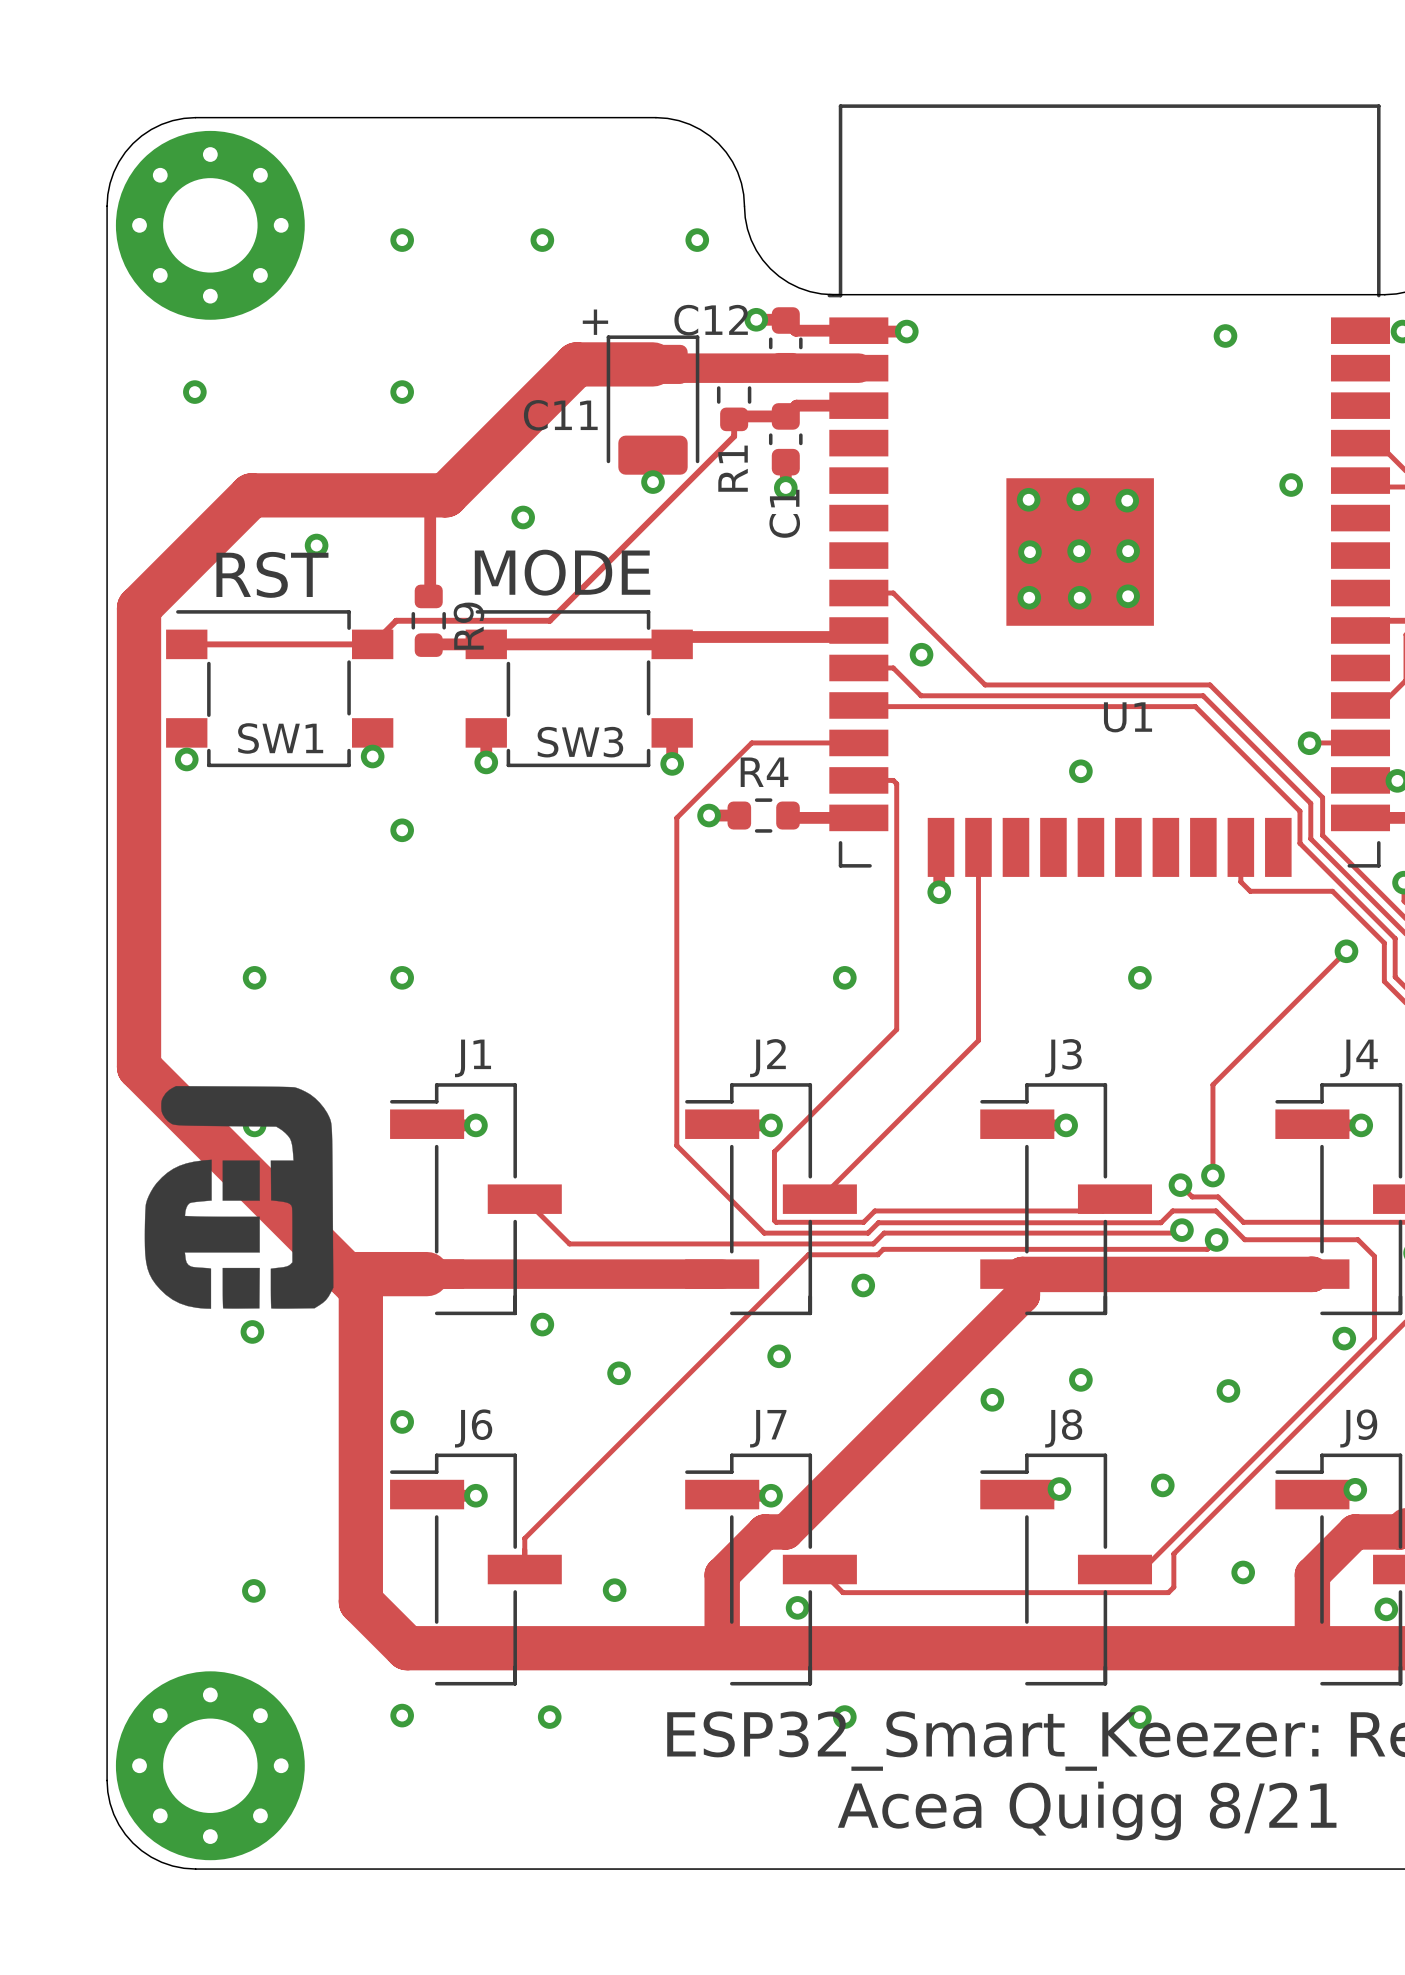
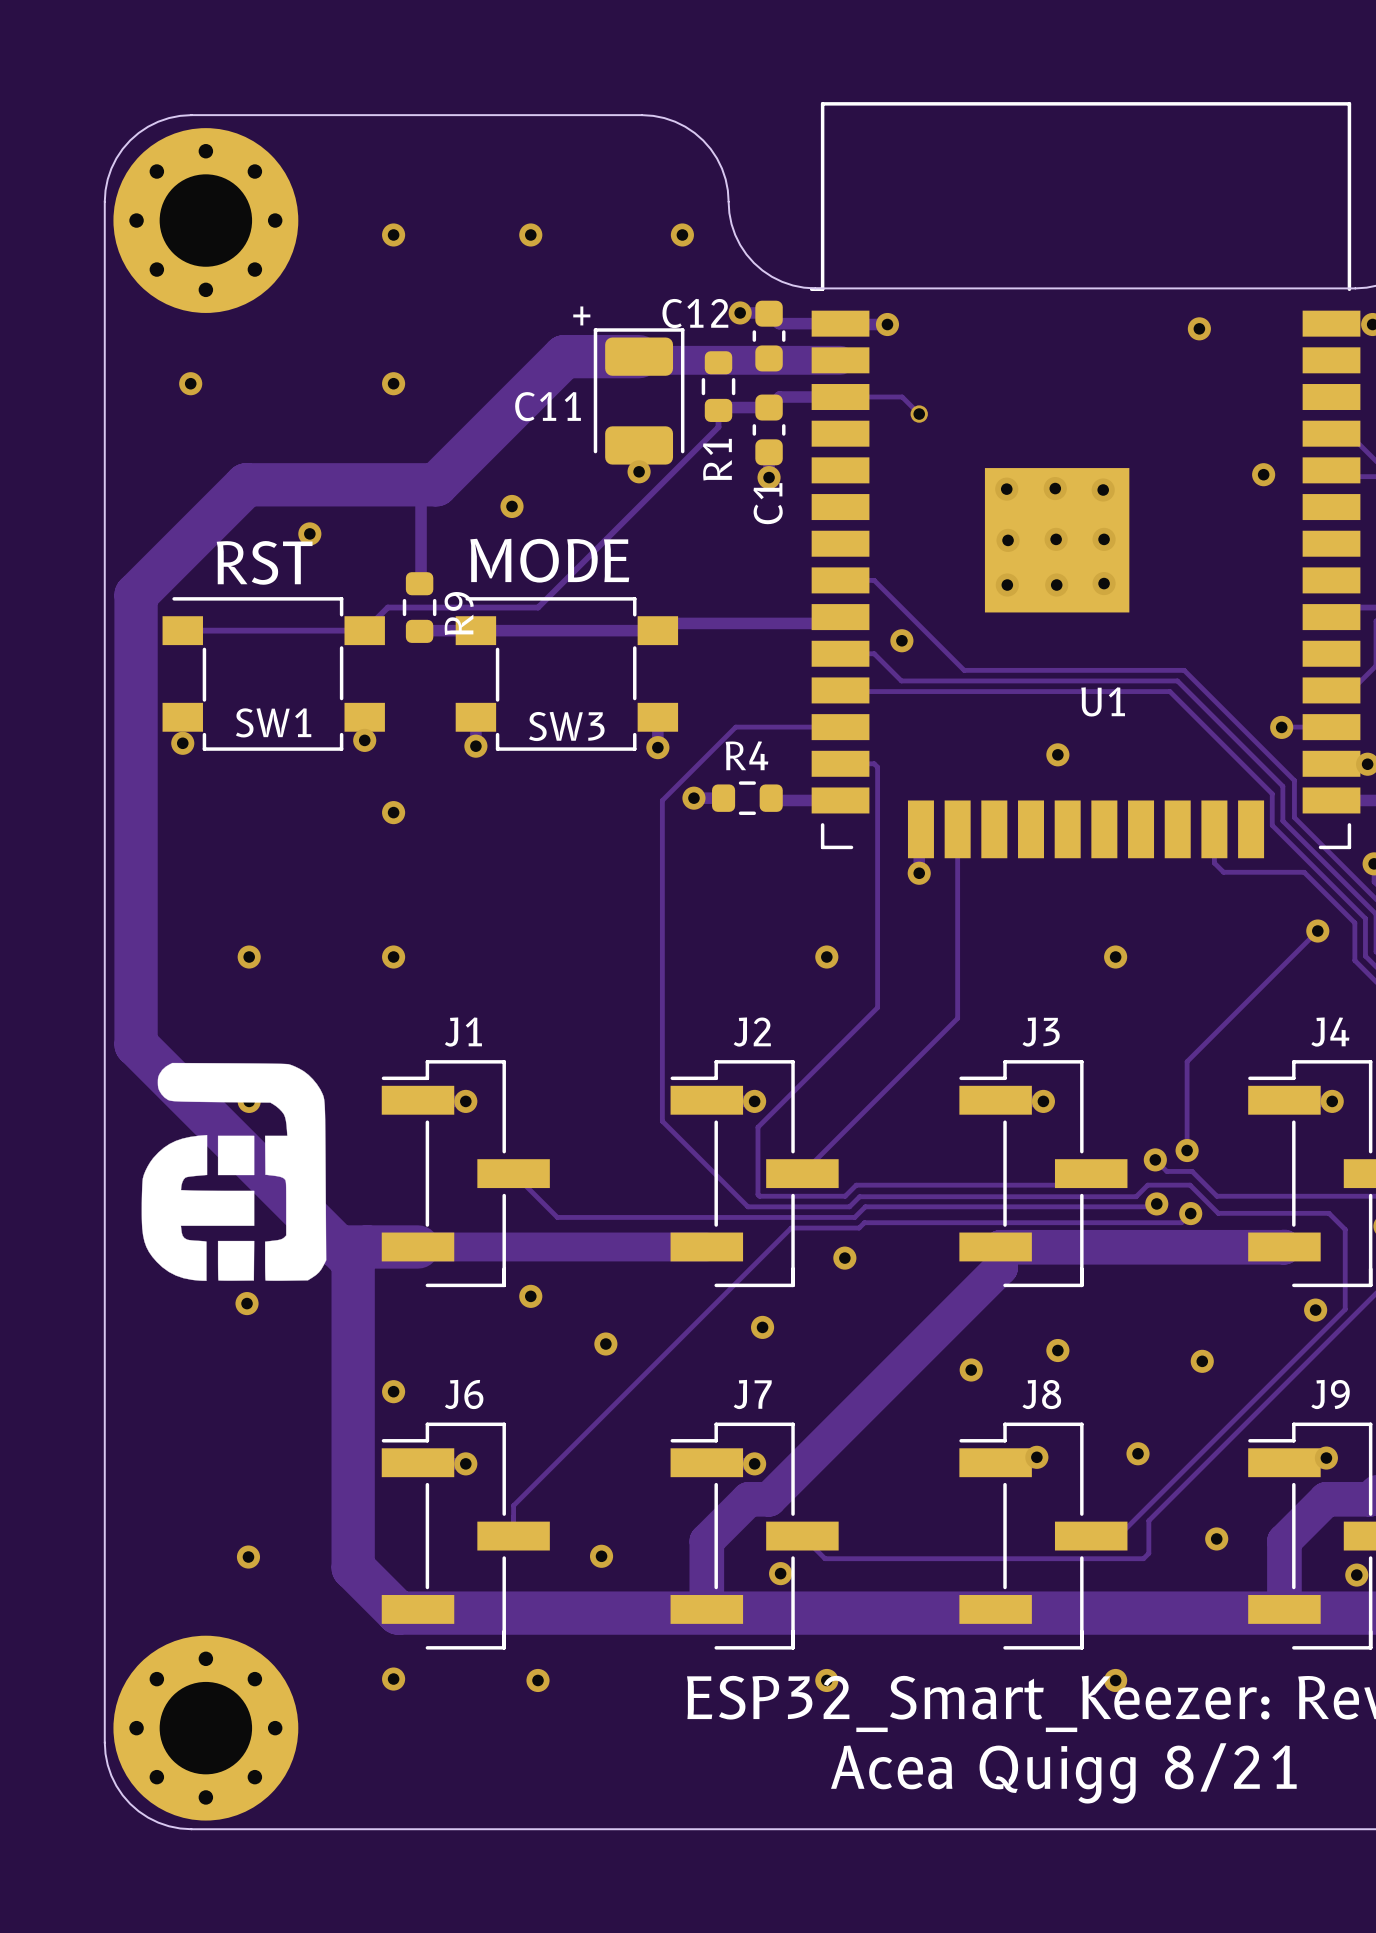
track: none -> (840, 397) (902, 397) (919, 414)
via: none -> (919, 414)

